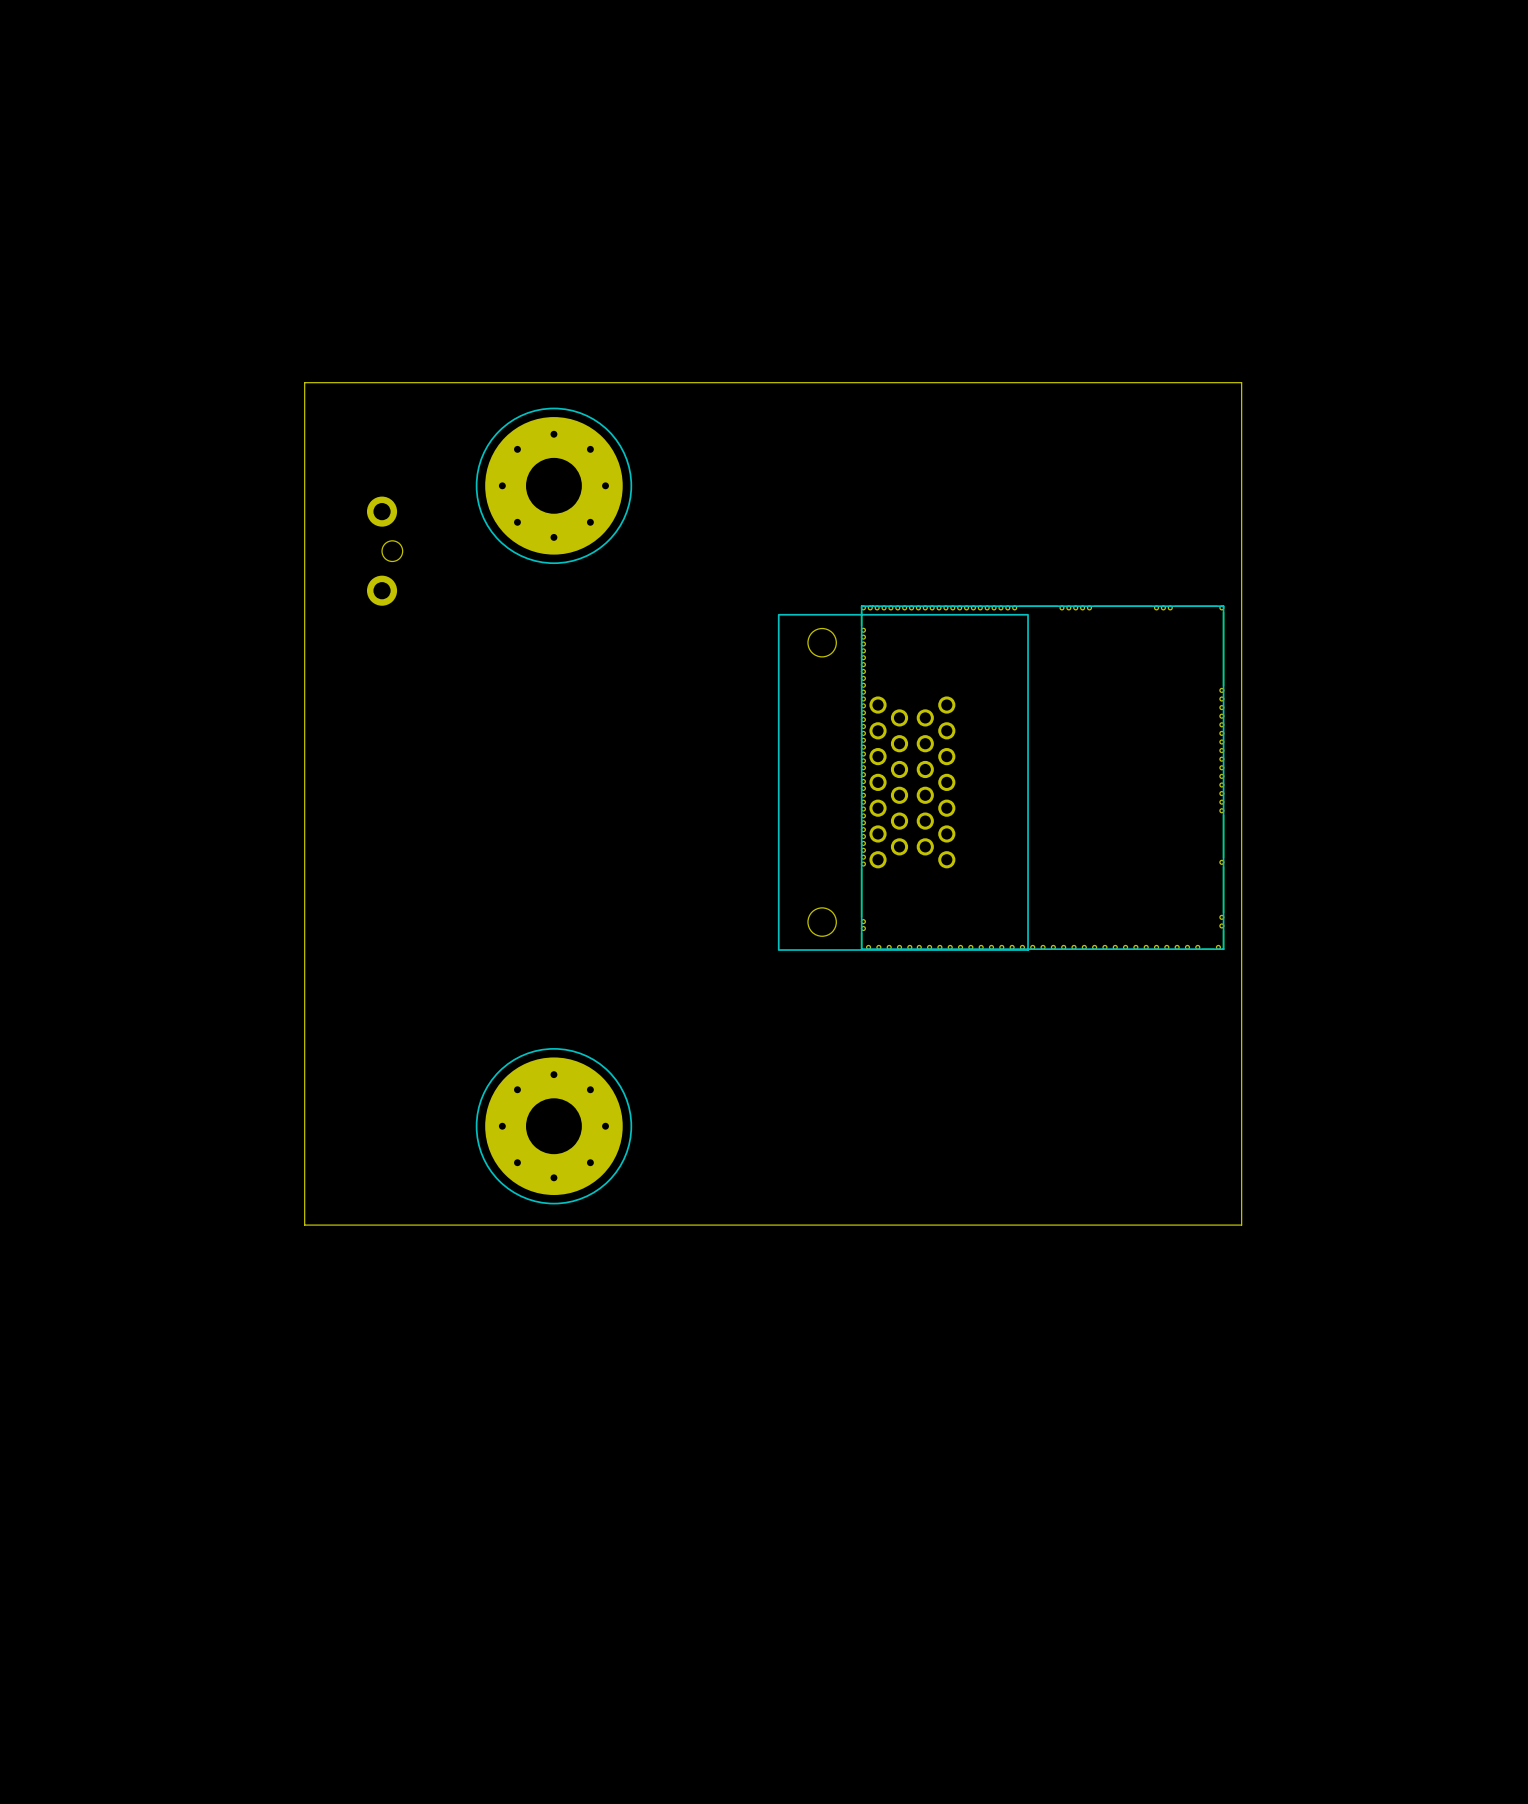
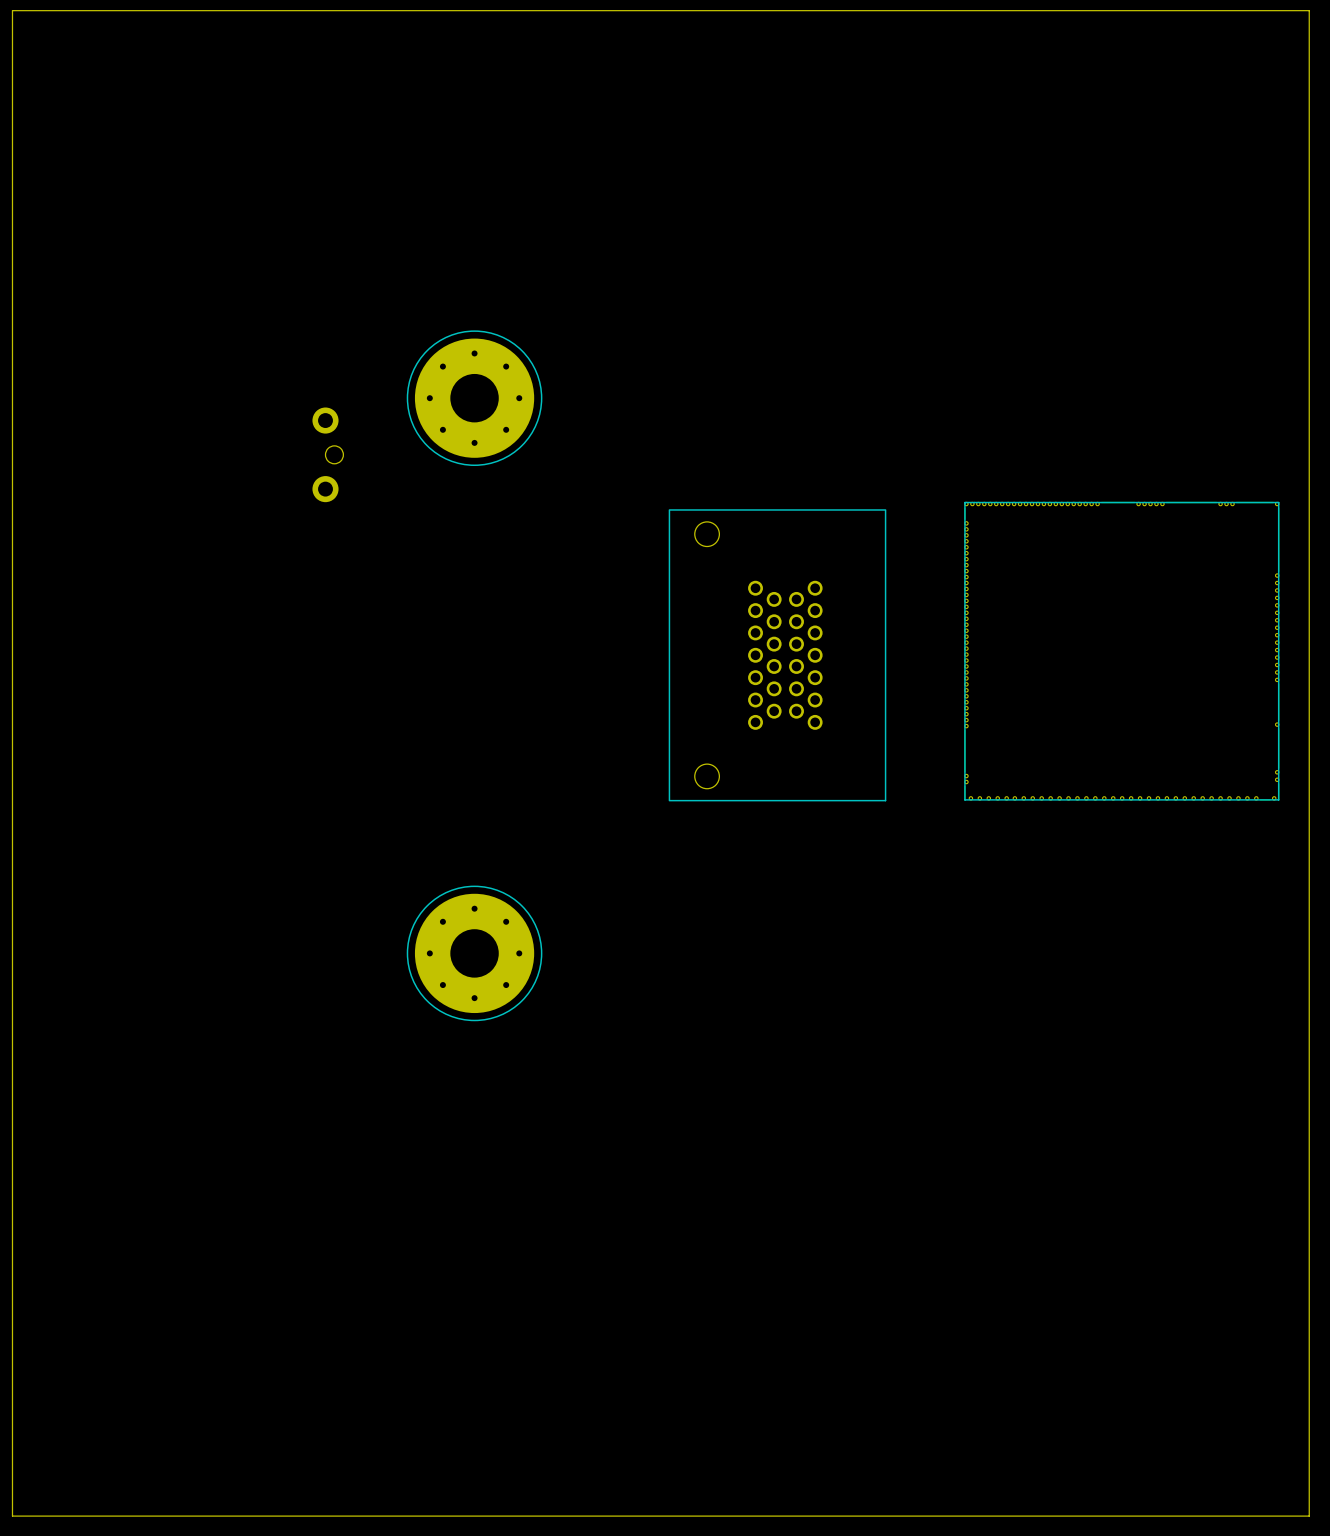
board edge: none -> (1309, 10) (12, 10) (12, 1516) (1309, 1516) (1309, 10)
board edge: (1241, 382) (304, 382) (304, 1225) (1241, 1225) (1241, 382) -> none
part: (1042, 777) -> none
part: none -> (1121, 651)

